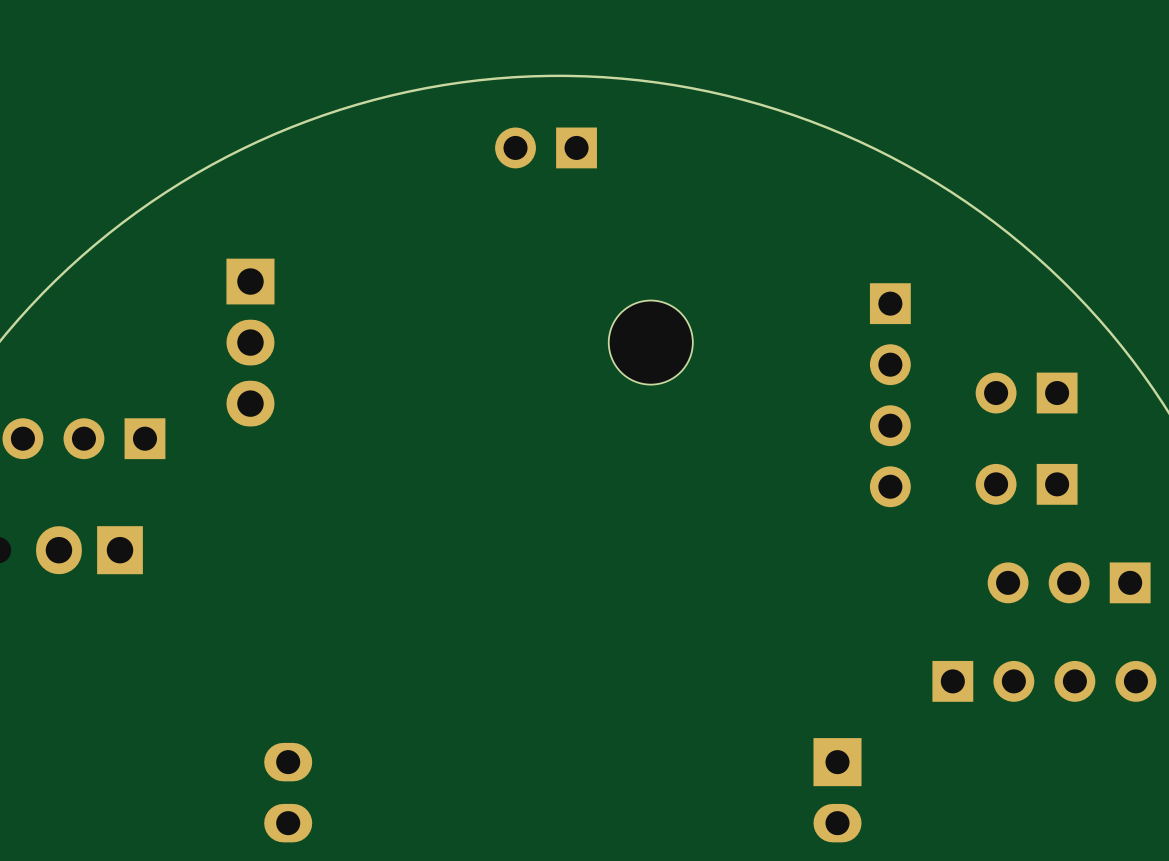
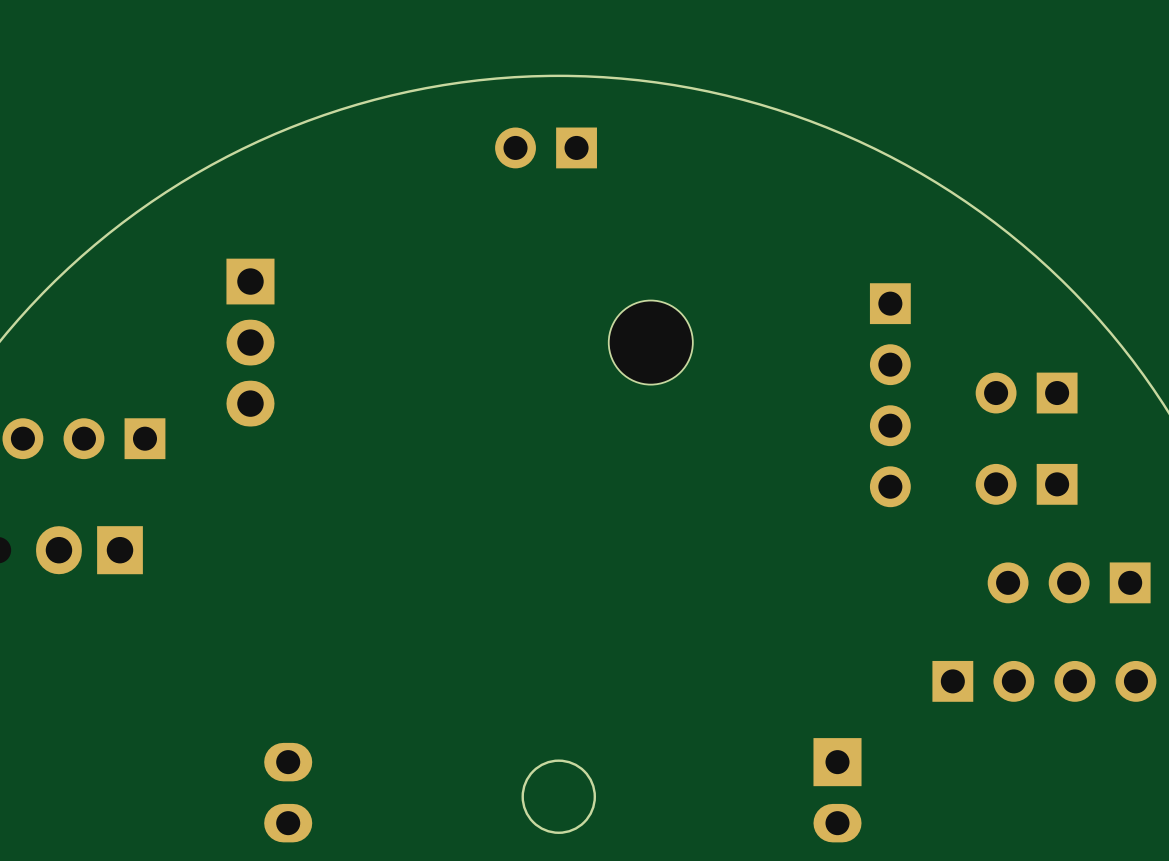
round board edge: none -> [521, 759, 597, 834]

